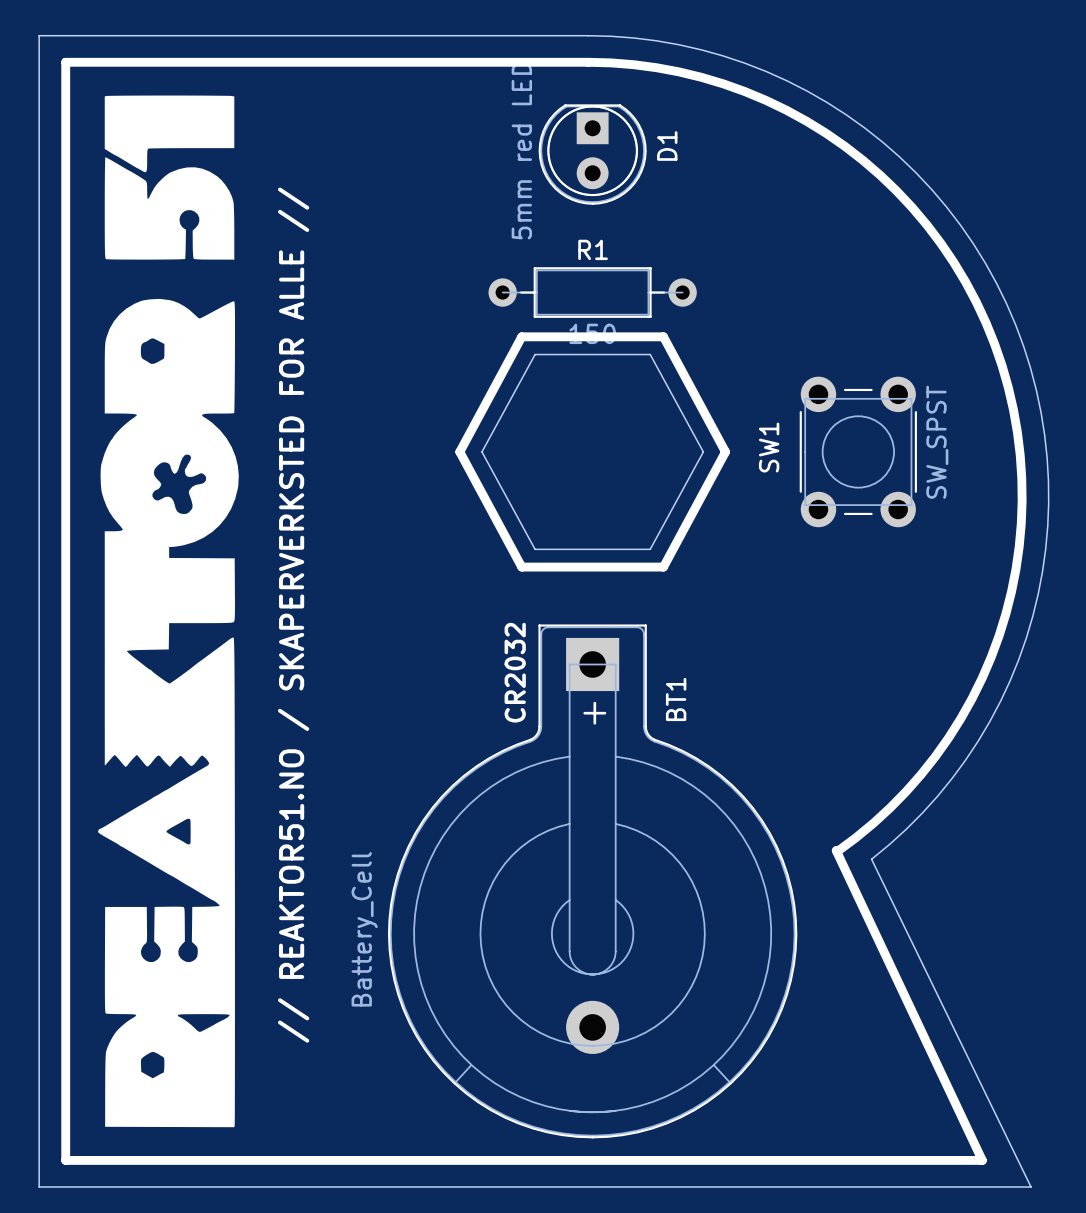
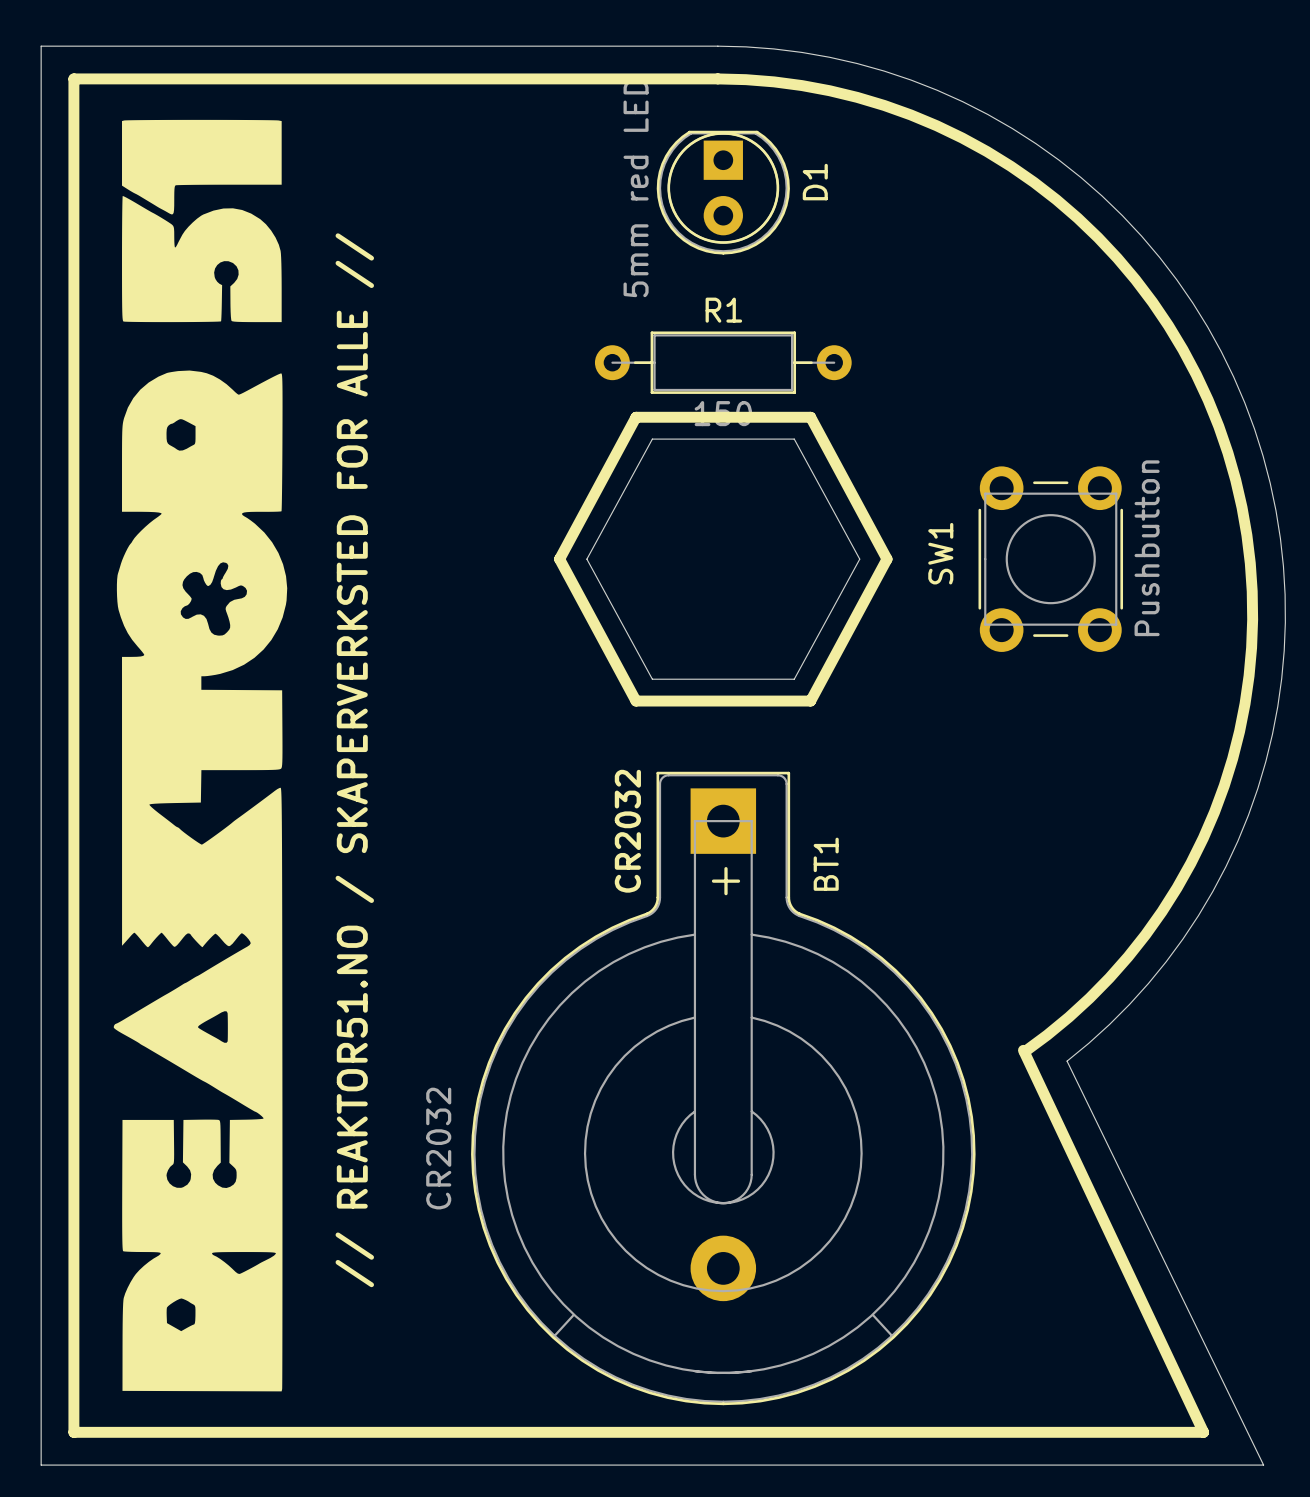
SW1 value: SW_SPST (937, 442) -> Pushbutton (1147, 548)
BT1 value: Battery_Cell (364, 929) -> CR2032 (438, 1148)

